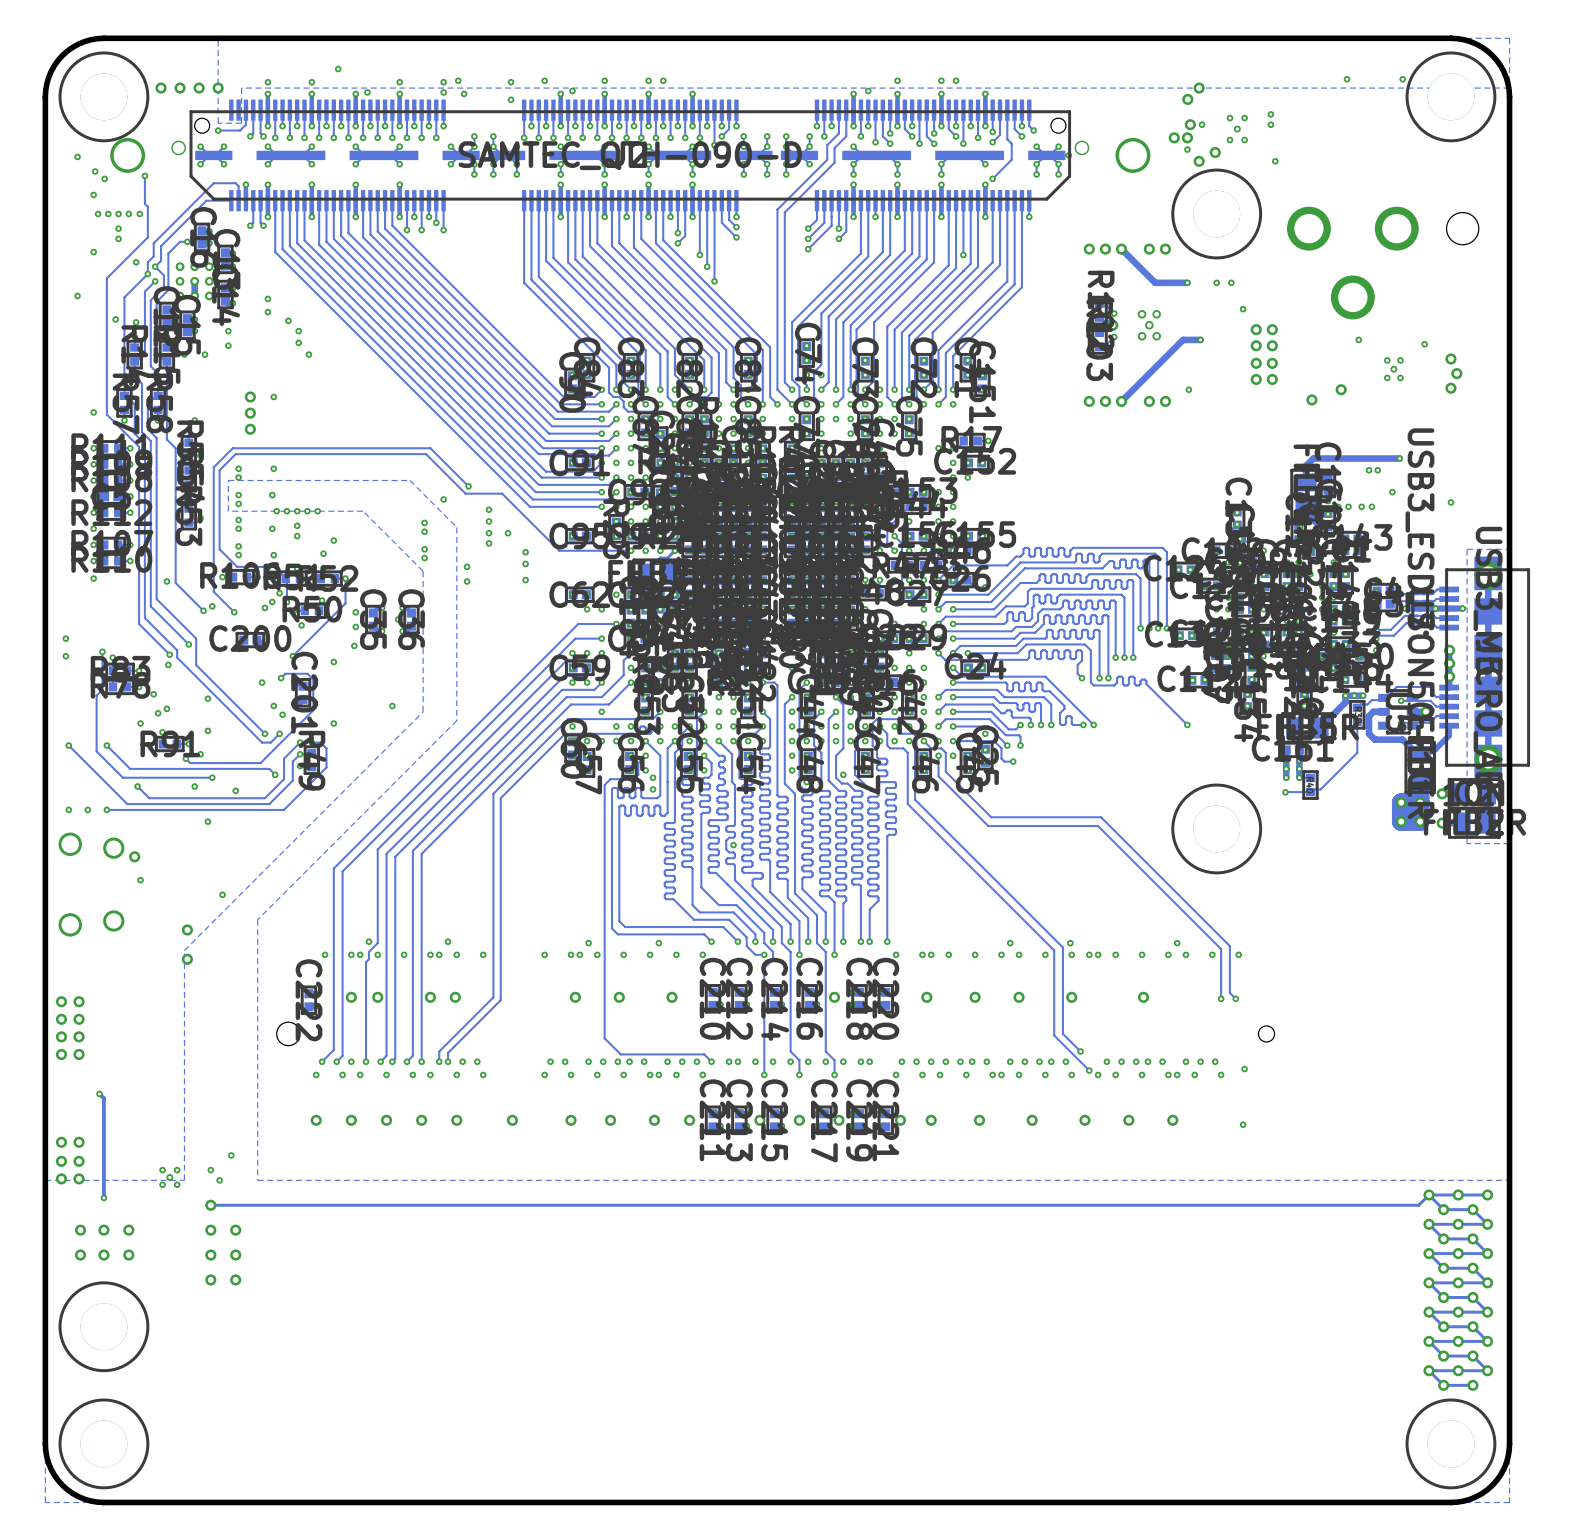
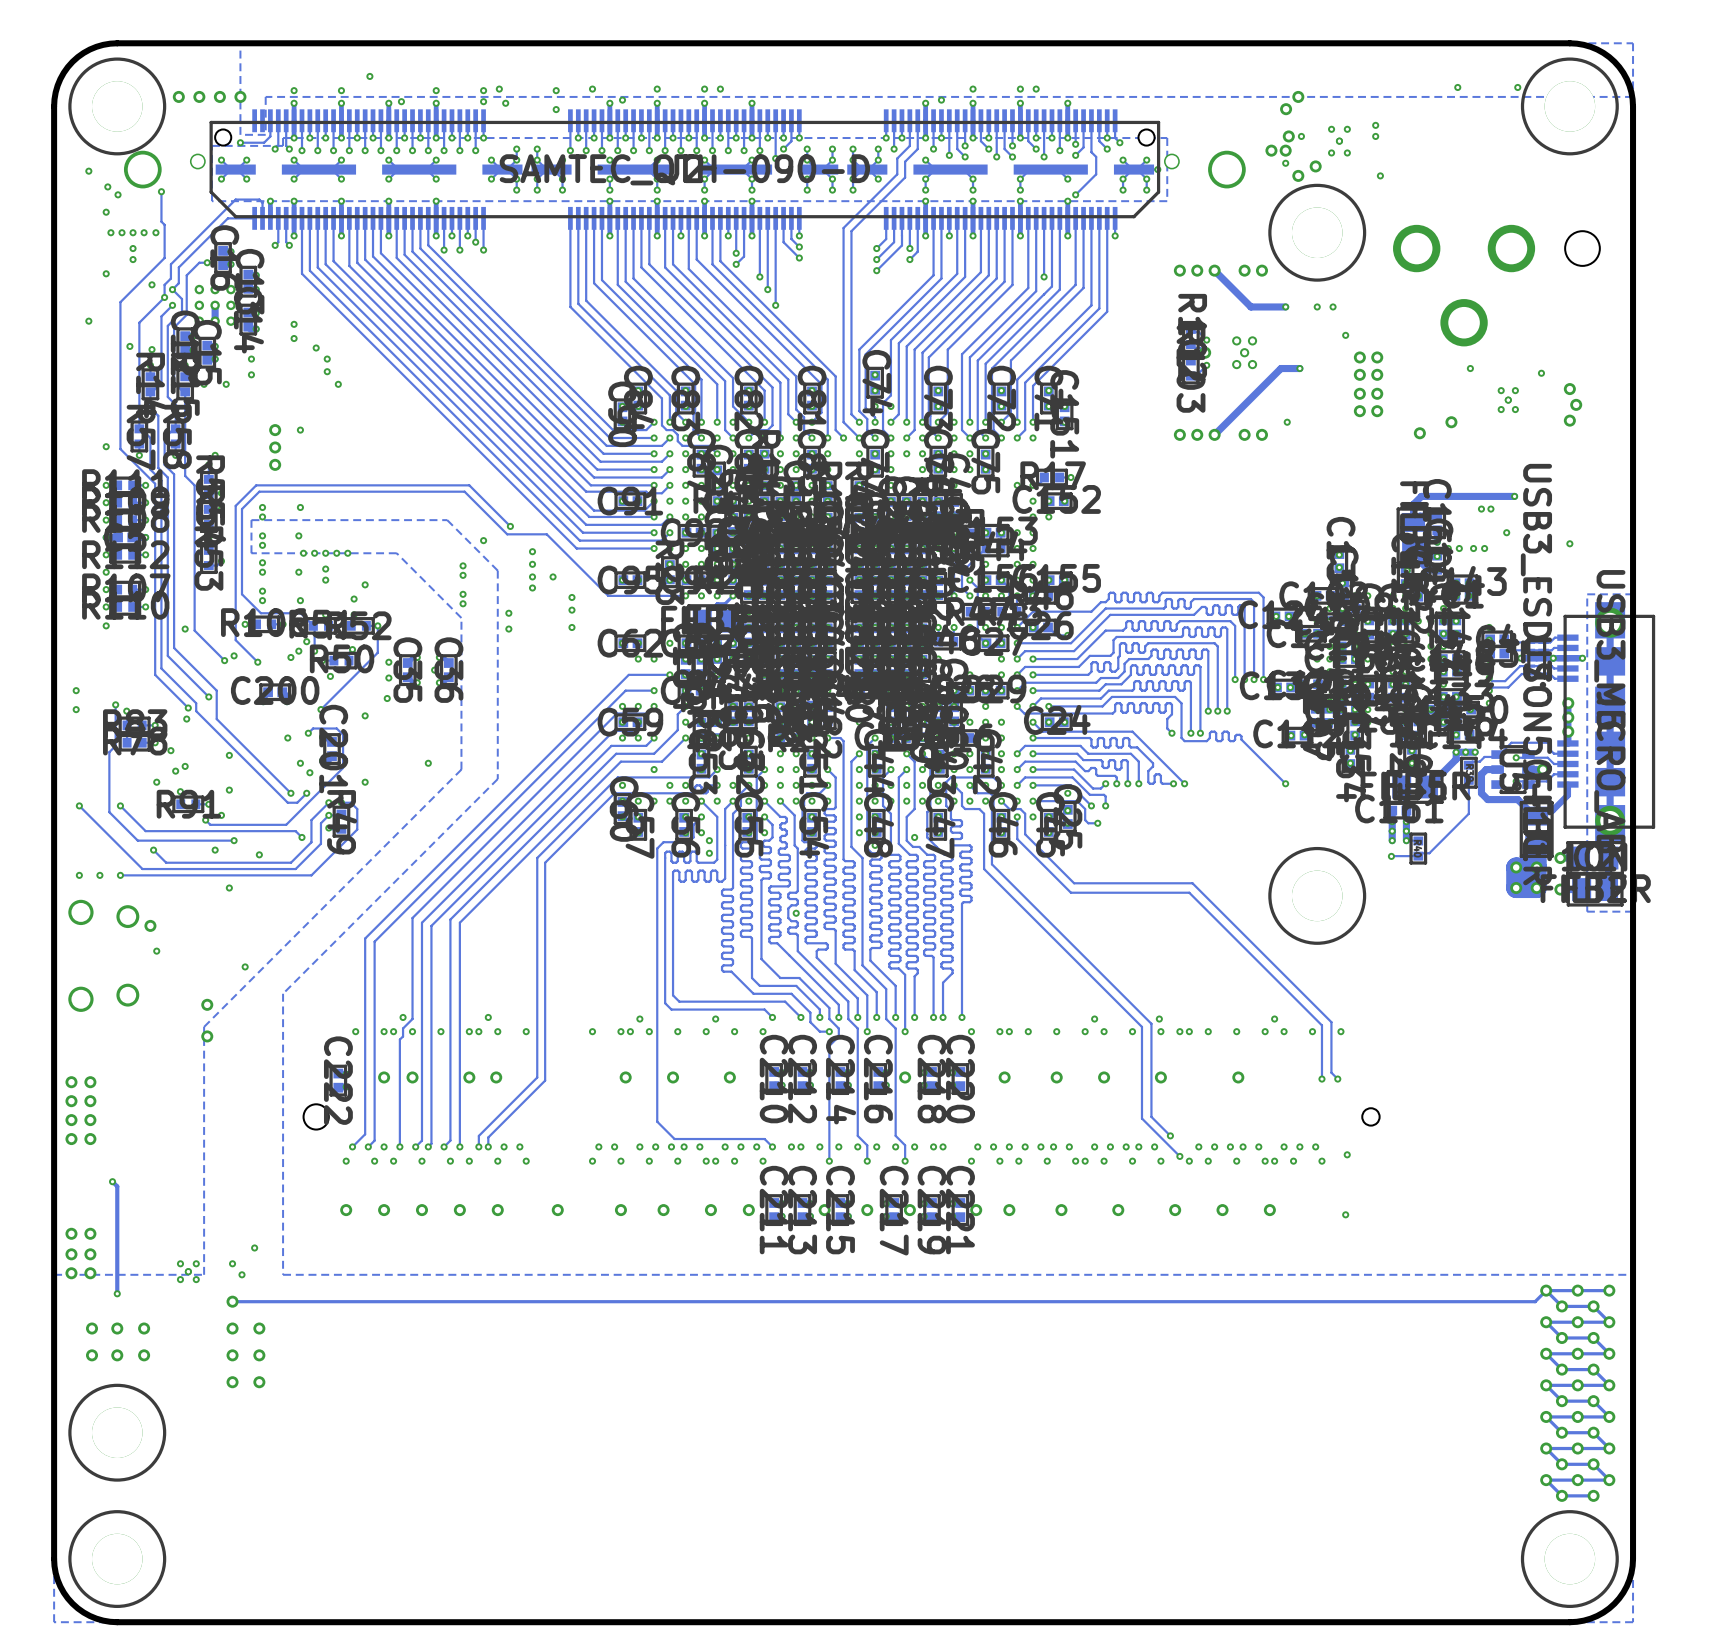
zone outline: none -> (1167, 138) (283, 138) (283, 145) (211, 145) (211, 201) (1167, 201) (1167, 138)

